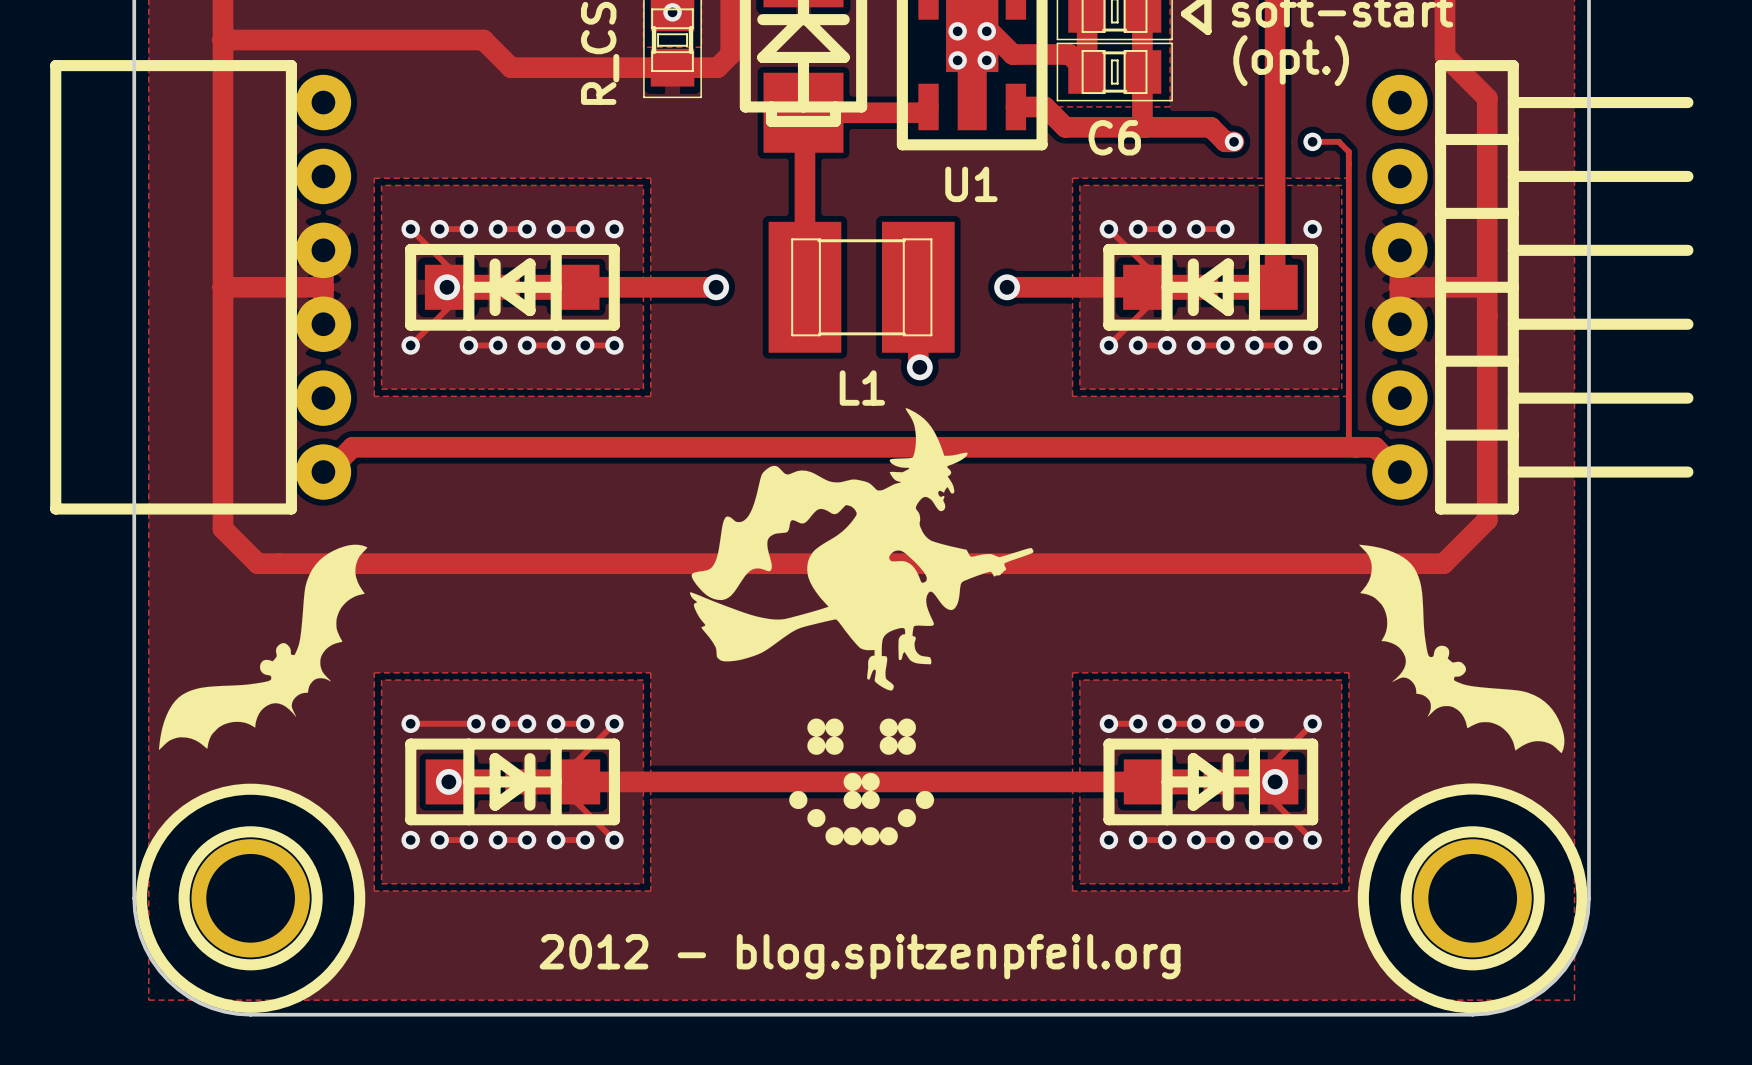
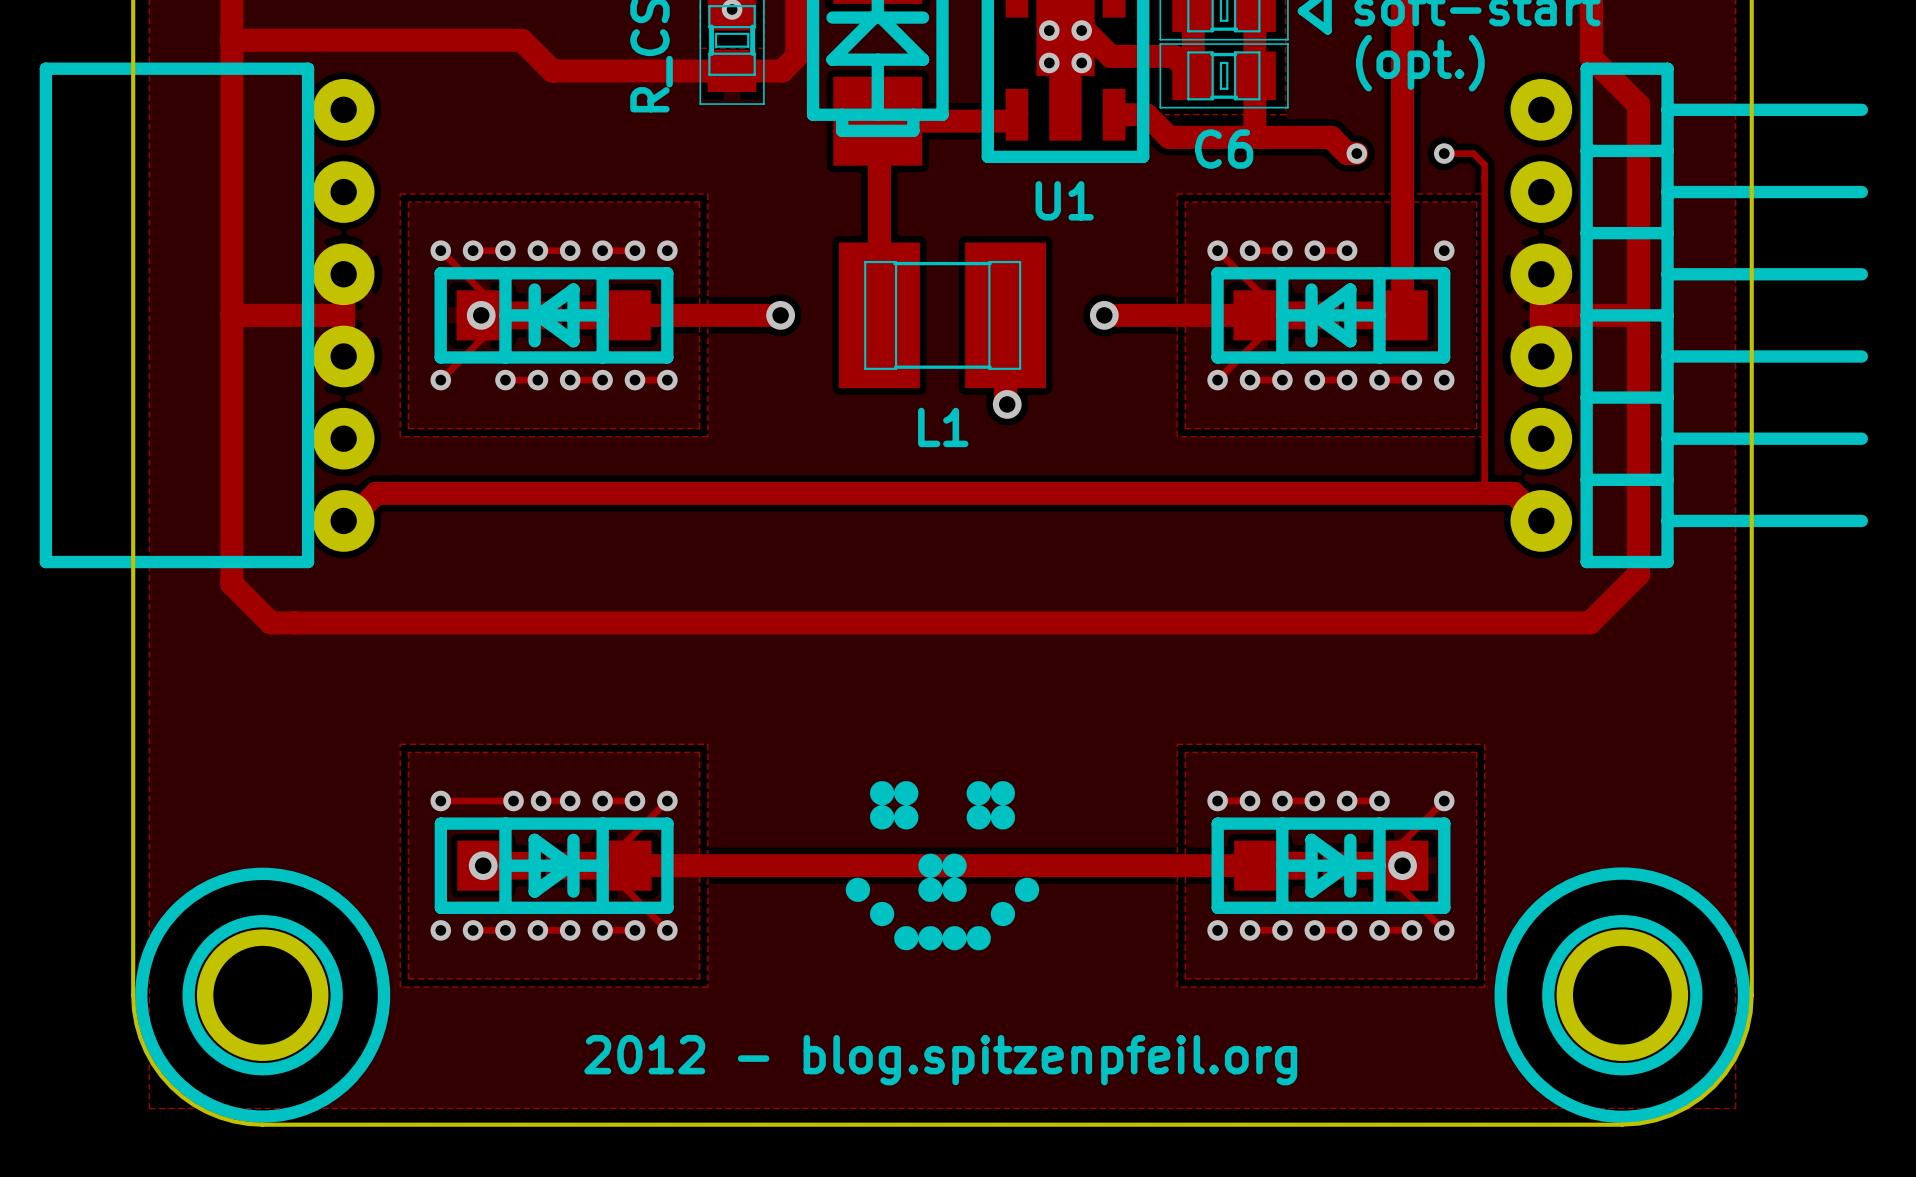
drawing: [689, 408, 1034, 691] -> none
drawing: [158, 544, 368, 750] -> none
drawing: [1359, 544, 1565, 754] -> none
drawing shape: [789, 718, 935, 846] -> [845, 781, 1040, 951]

